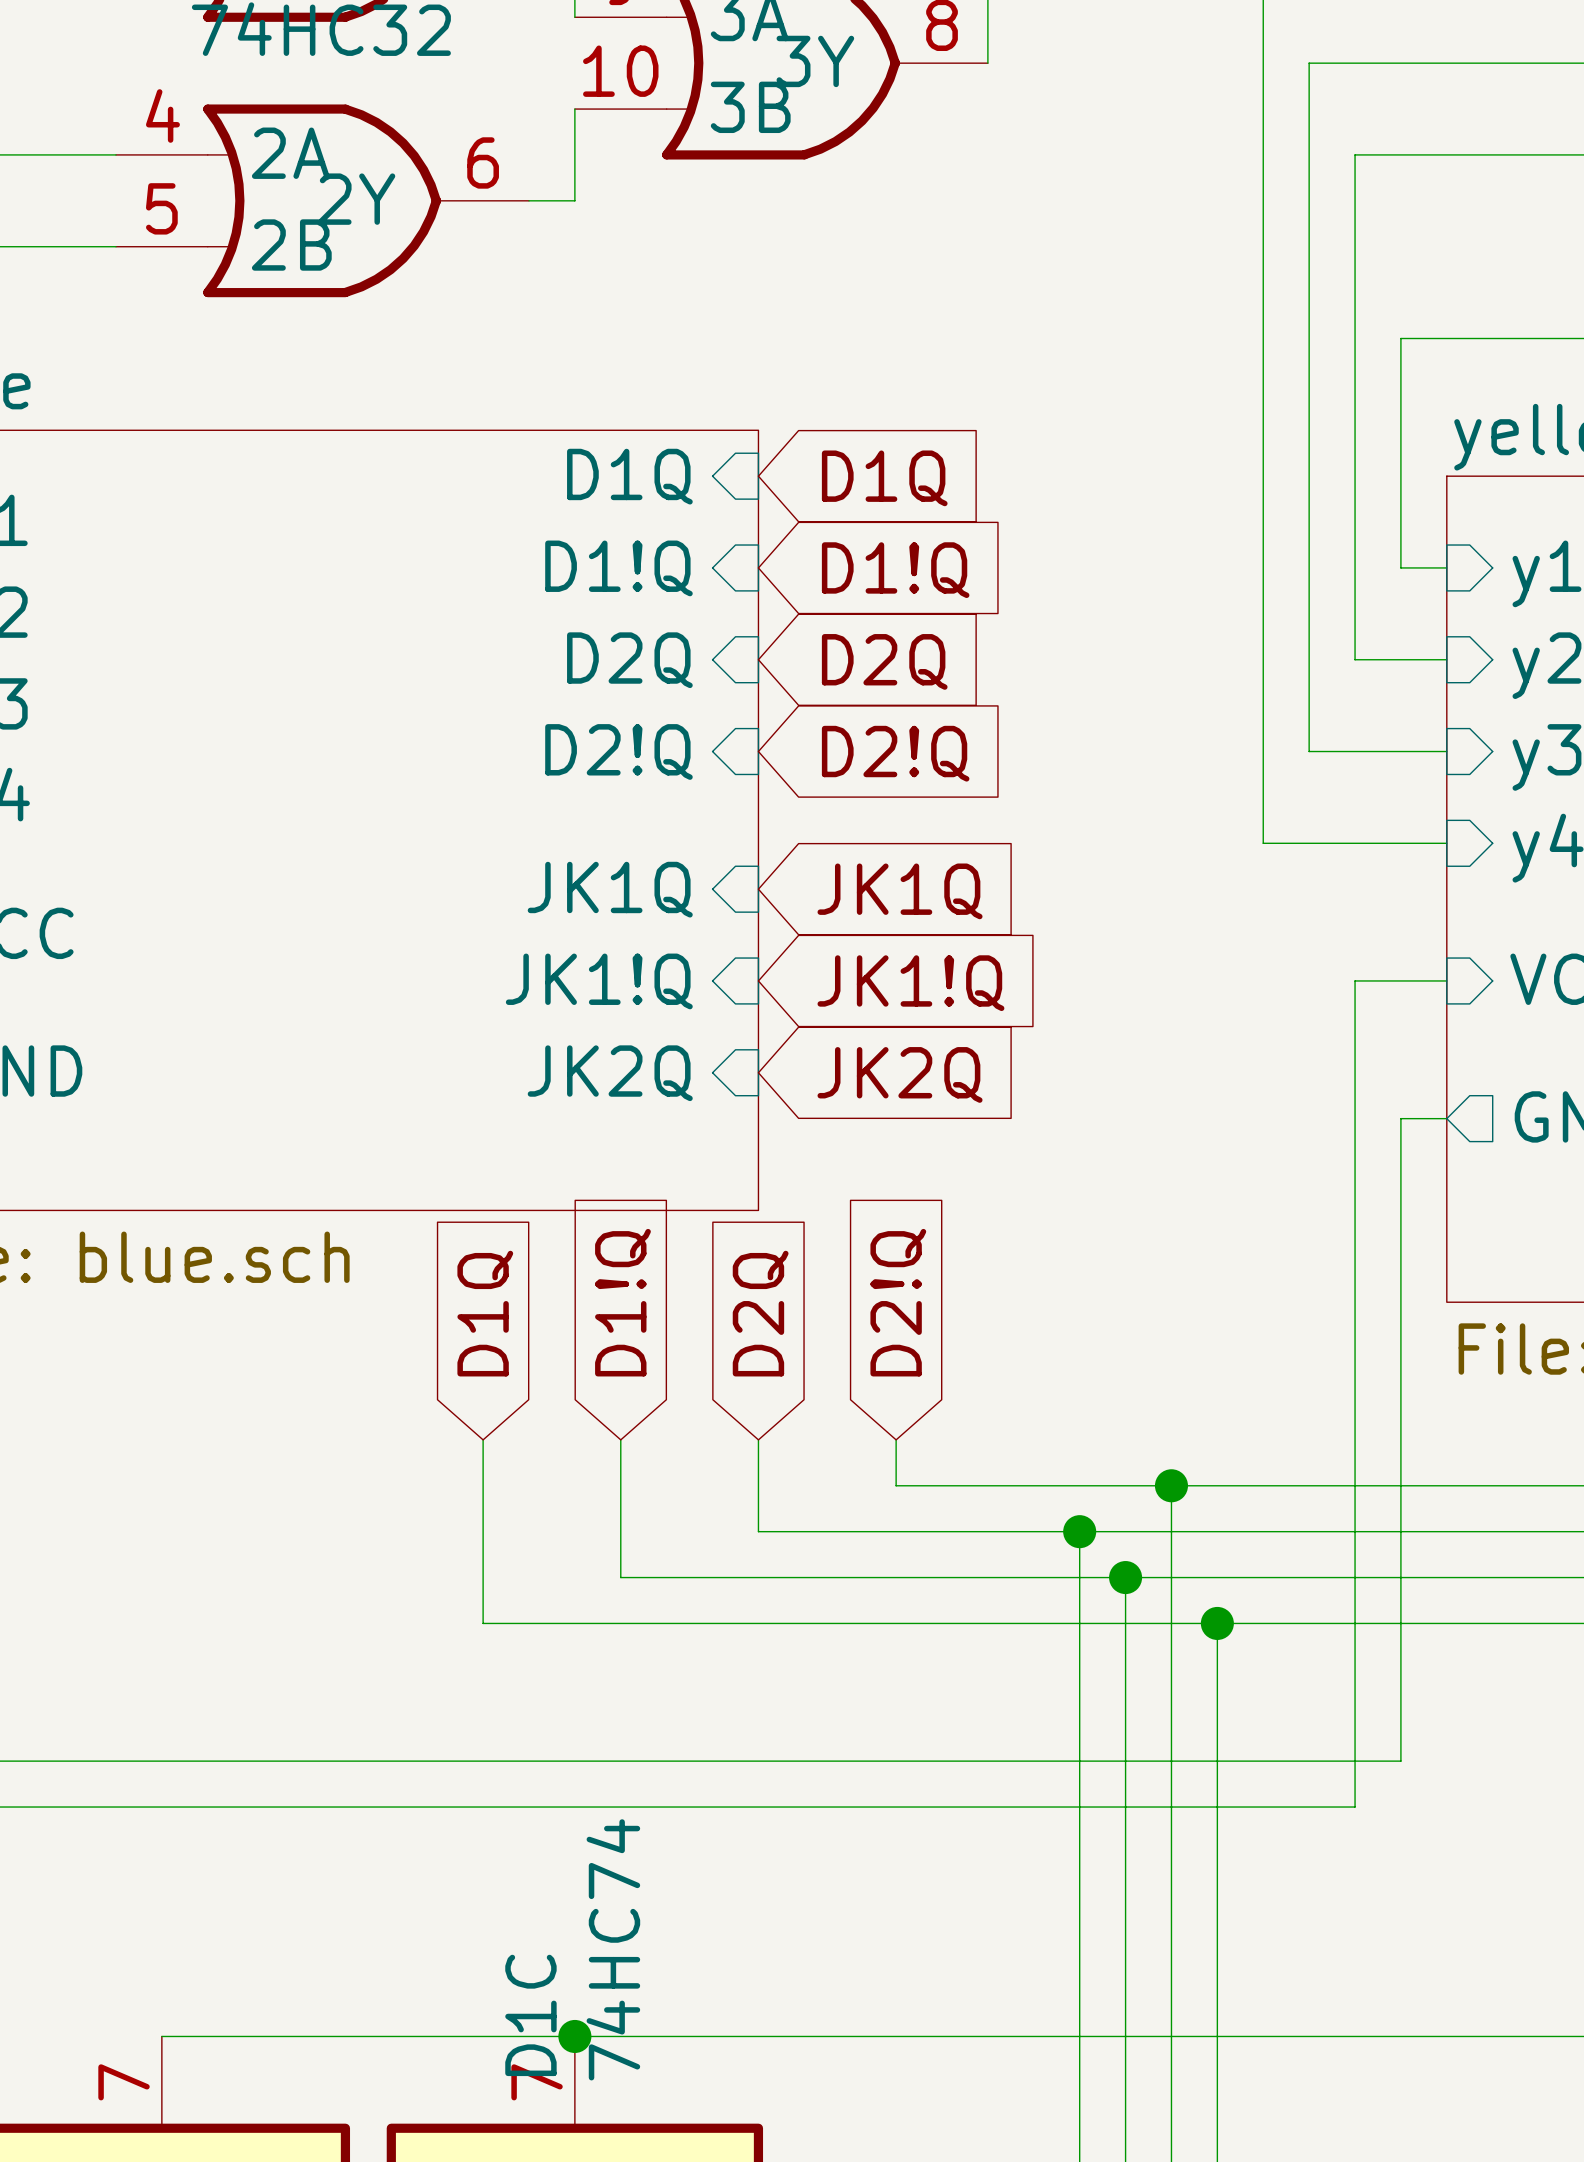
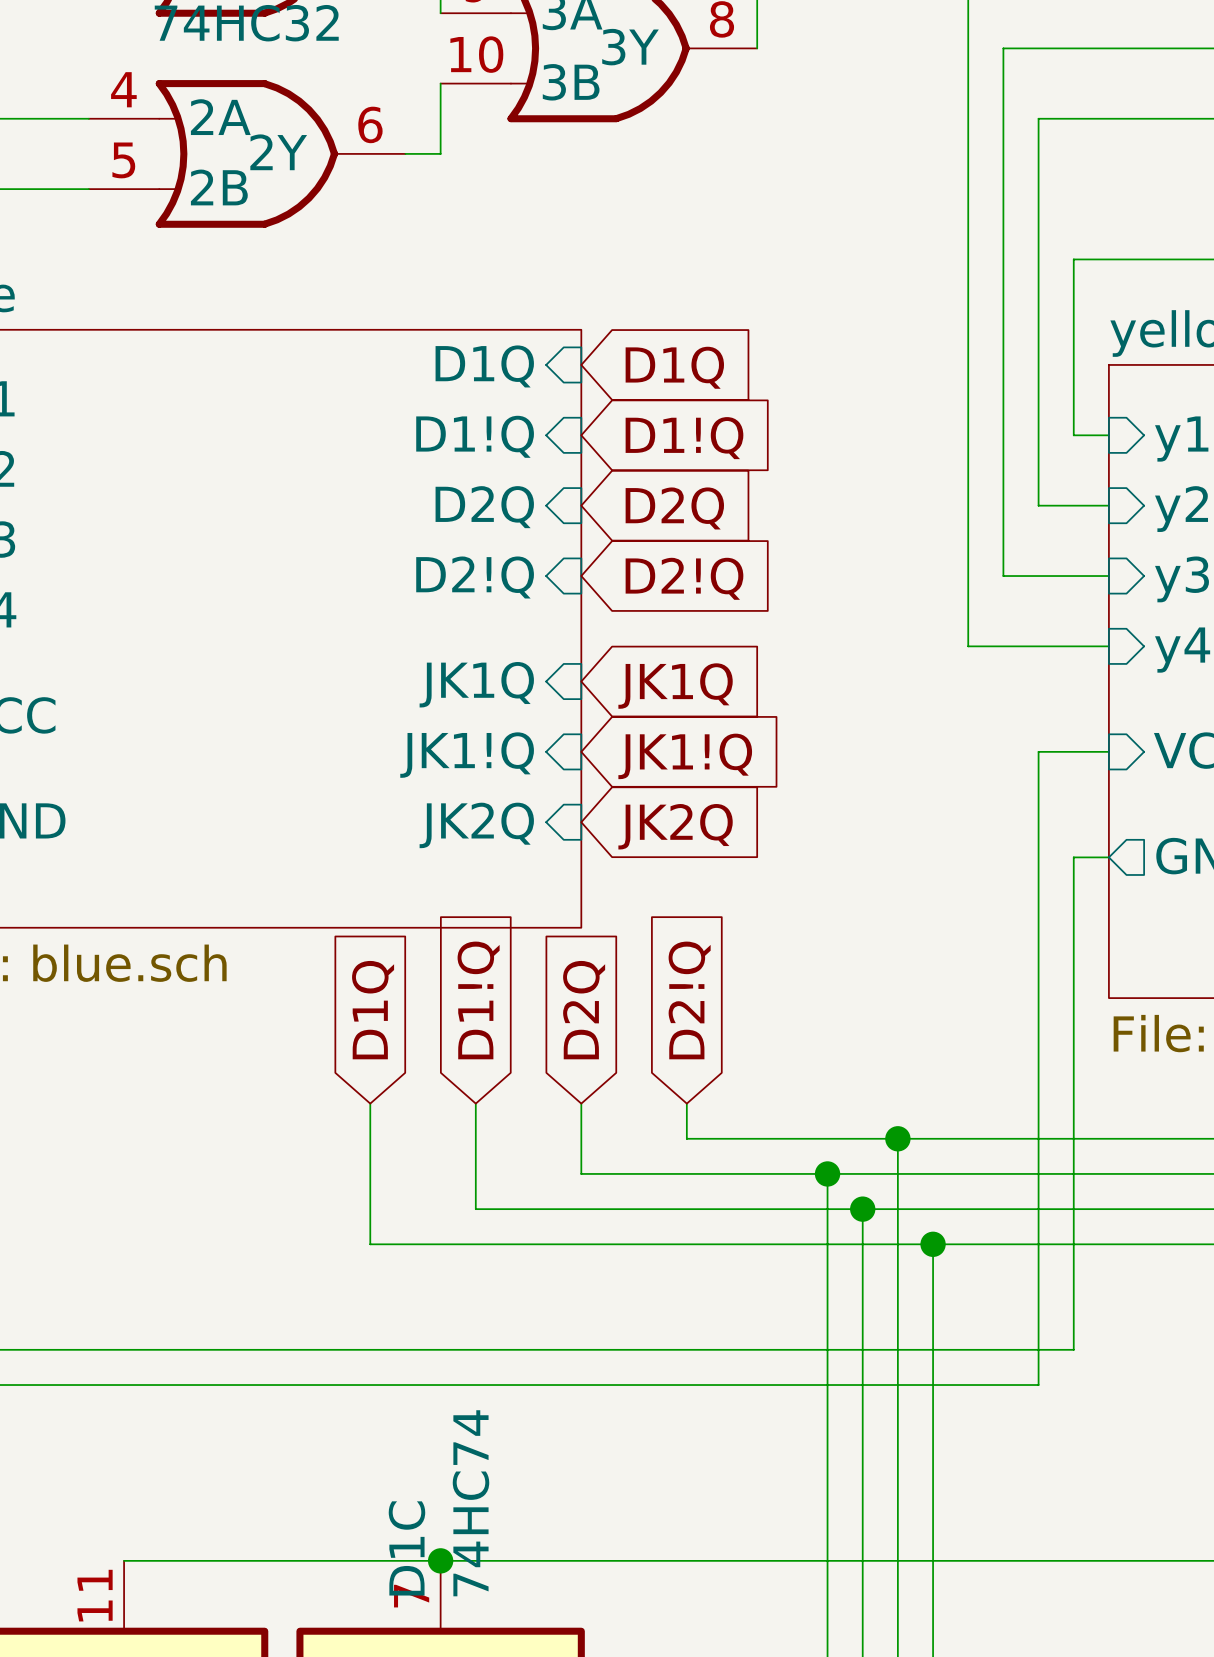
part pin number: 7 (124, 2082) -> 11 (95, 1595)

